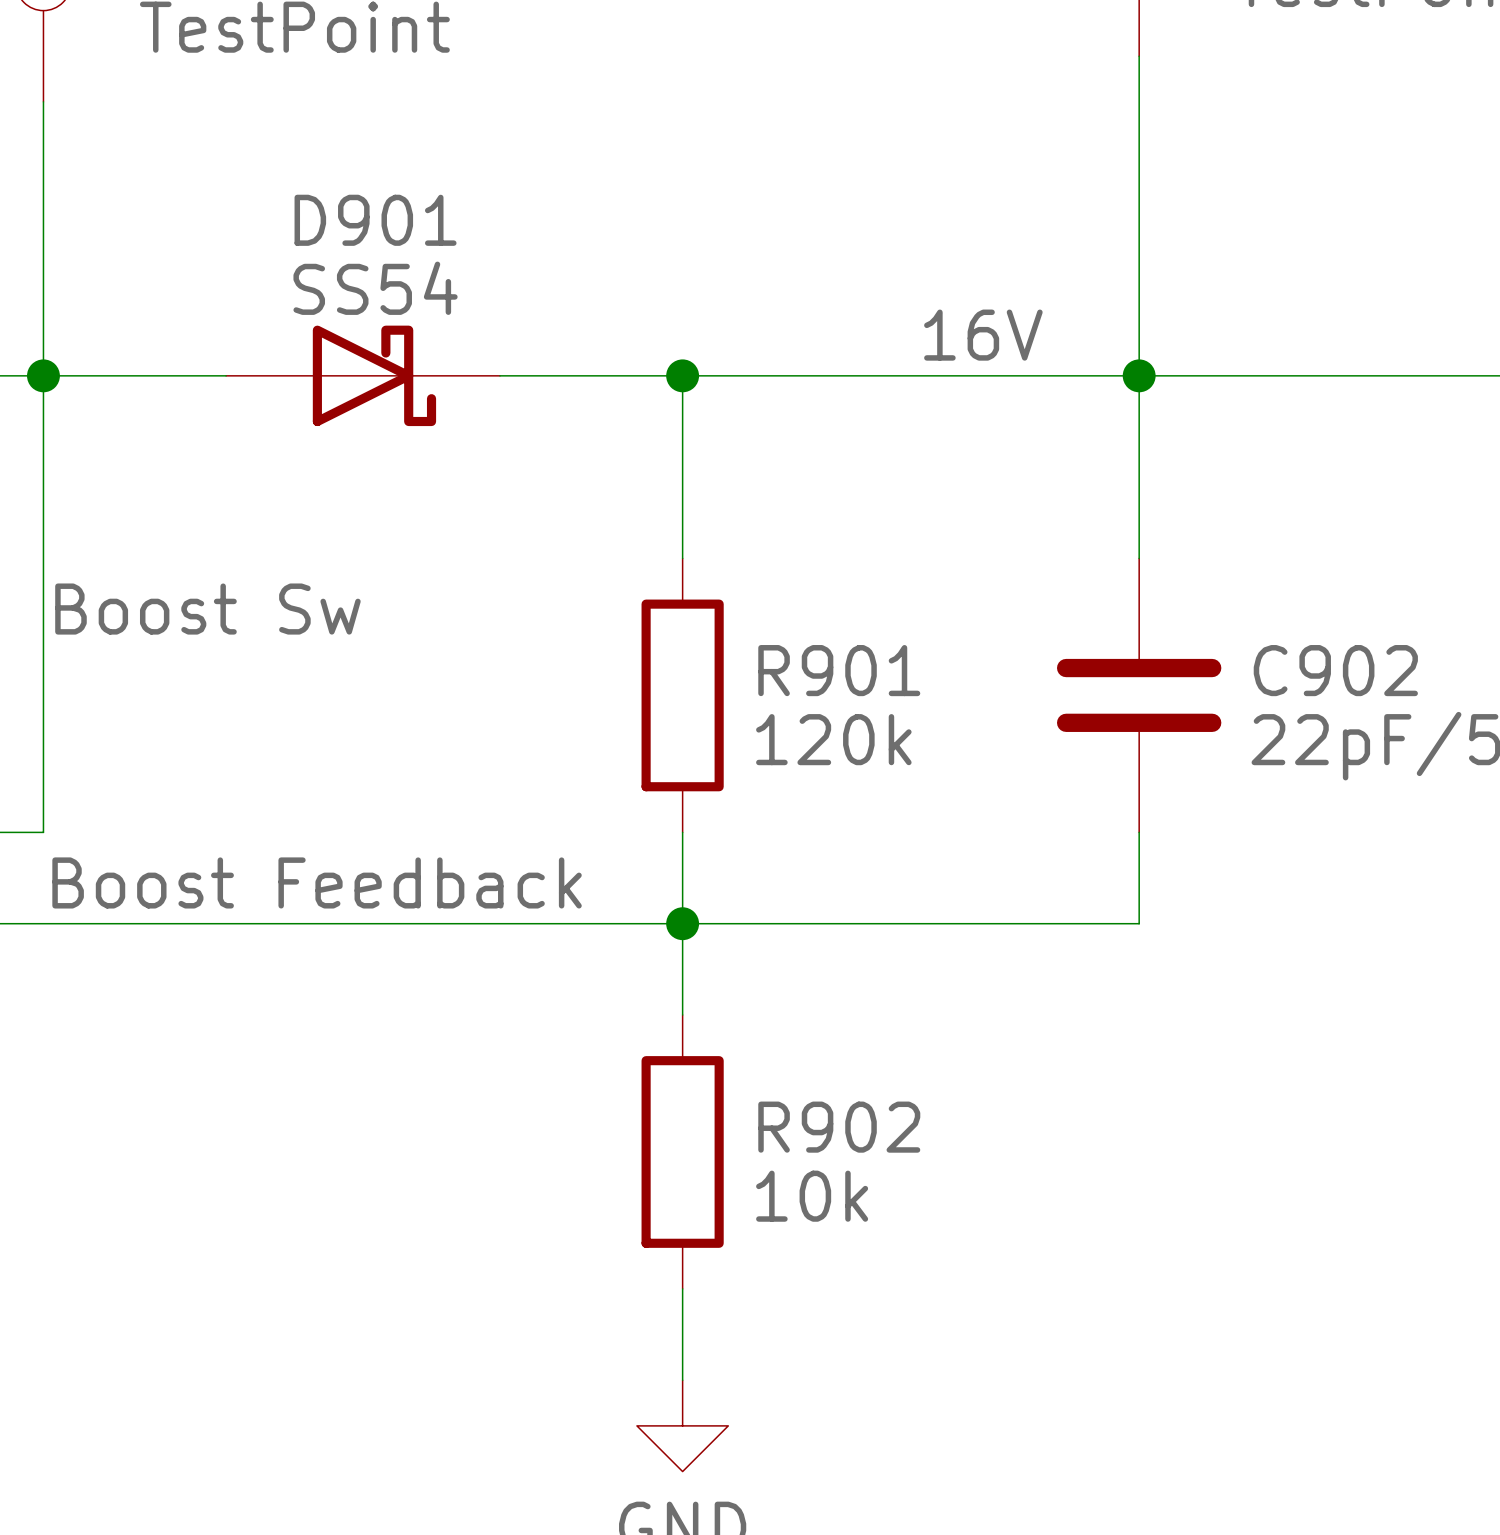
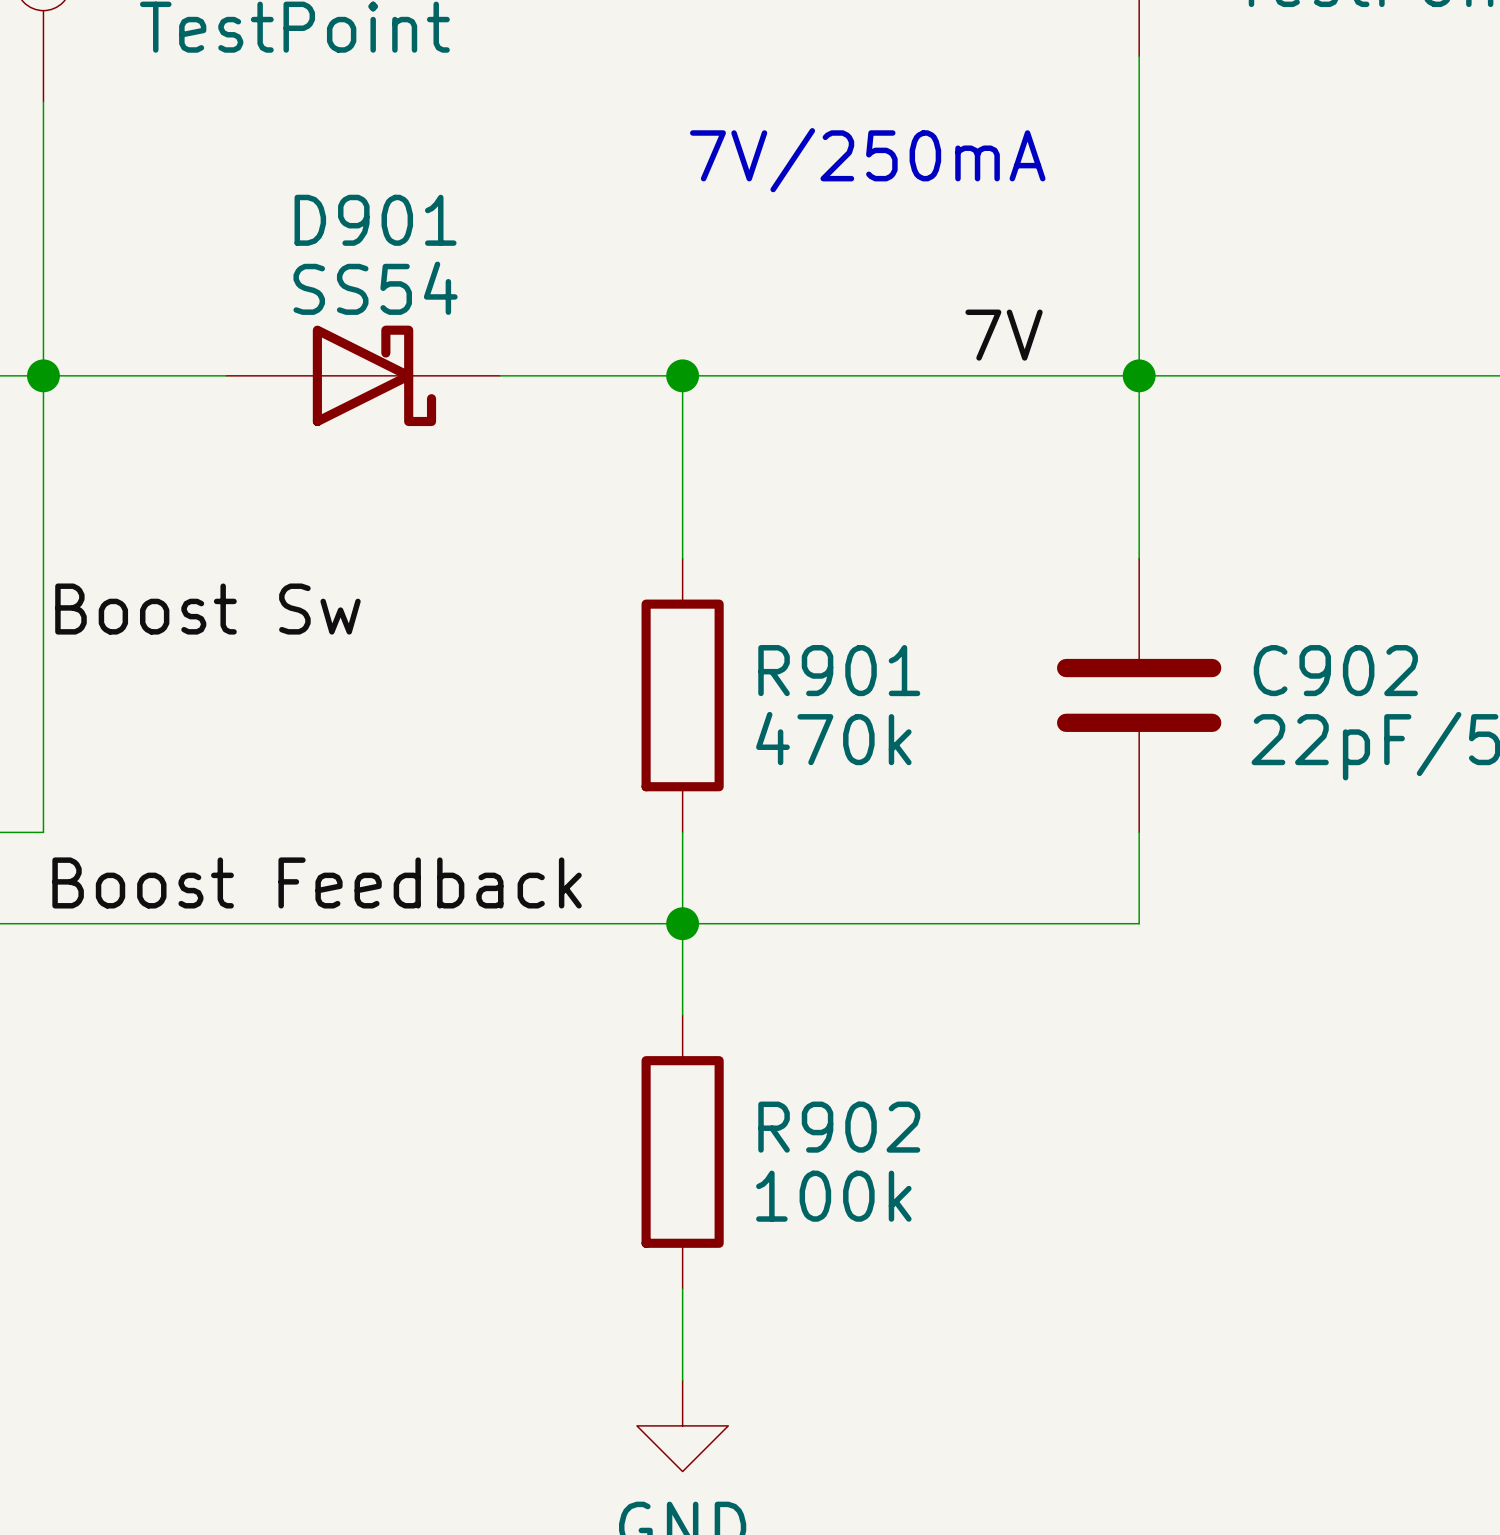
text: none -> 7V/250mA (867, 160)
label: 16V (983, 335) -> 7V (1004, 335)
R901 value: 120k (833, 739) -> 470k (833, 738)
R902 value: 10k (812, 1196) -> 100k (833, 1196)

